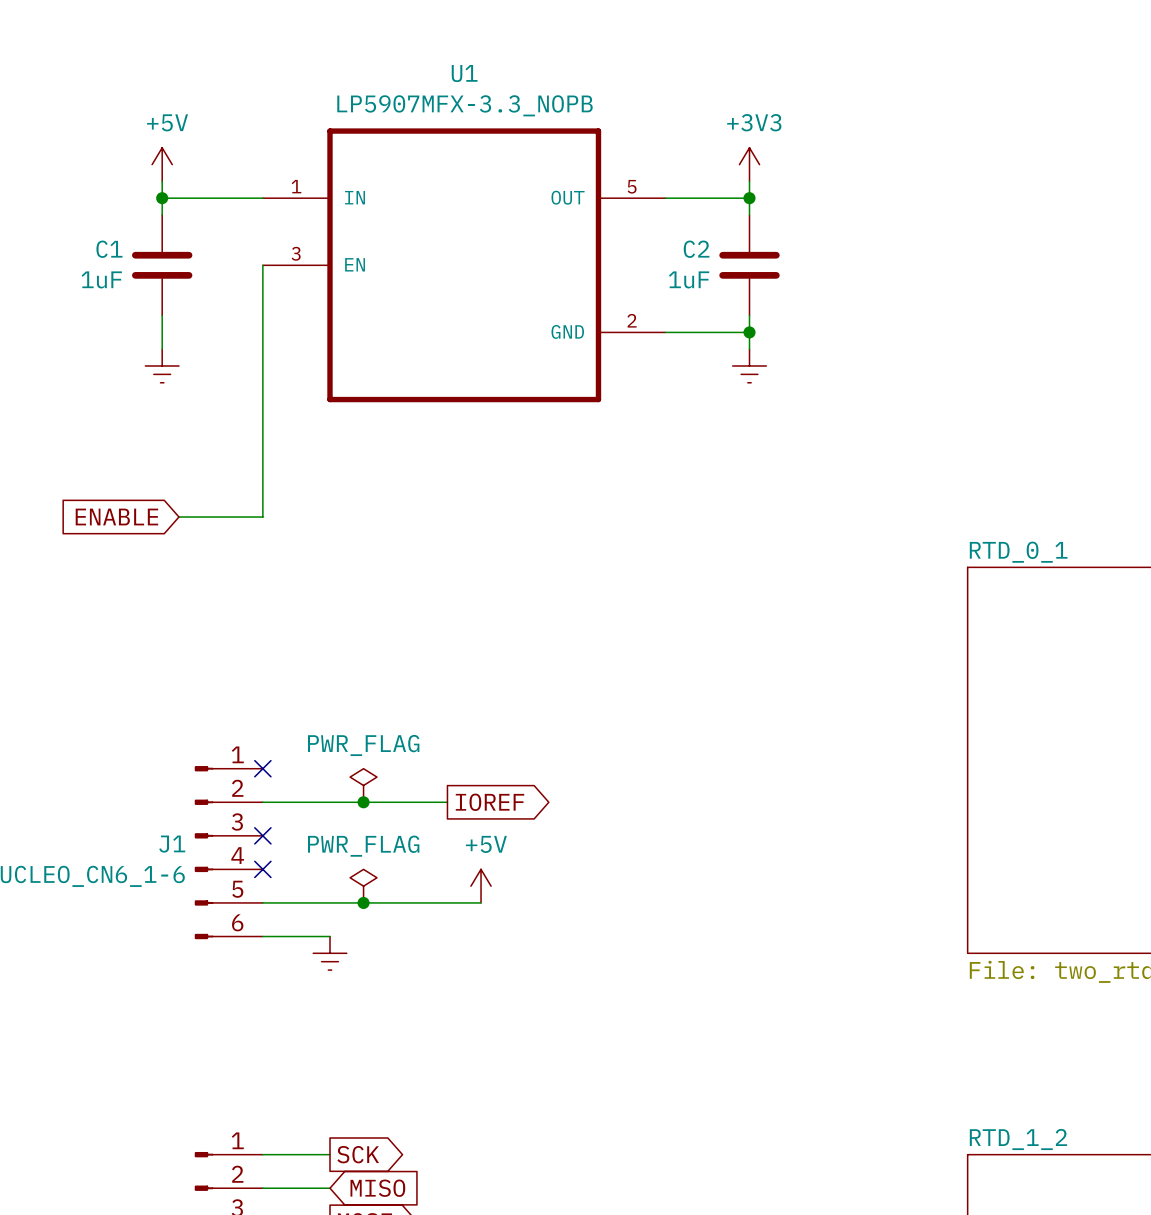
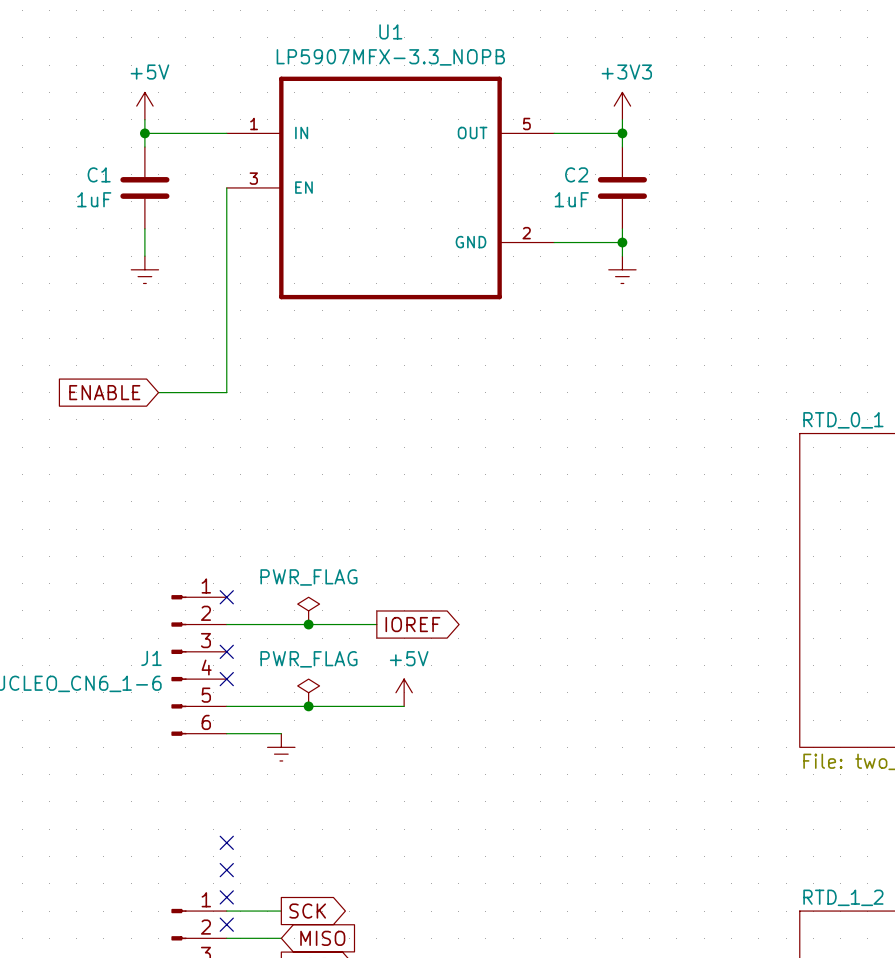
no-connect mark: none -> (226, 842)
no-connect mark: none -> (226, 870)
no-connect mark: none -> (226, 897)
no-connect mark: none -> (226, 924)

